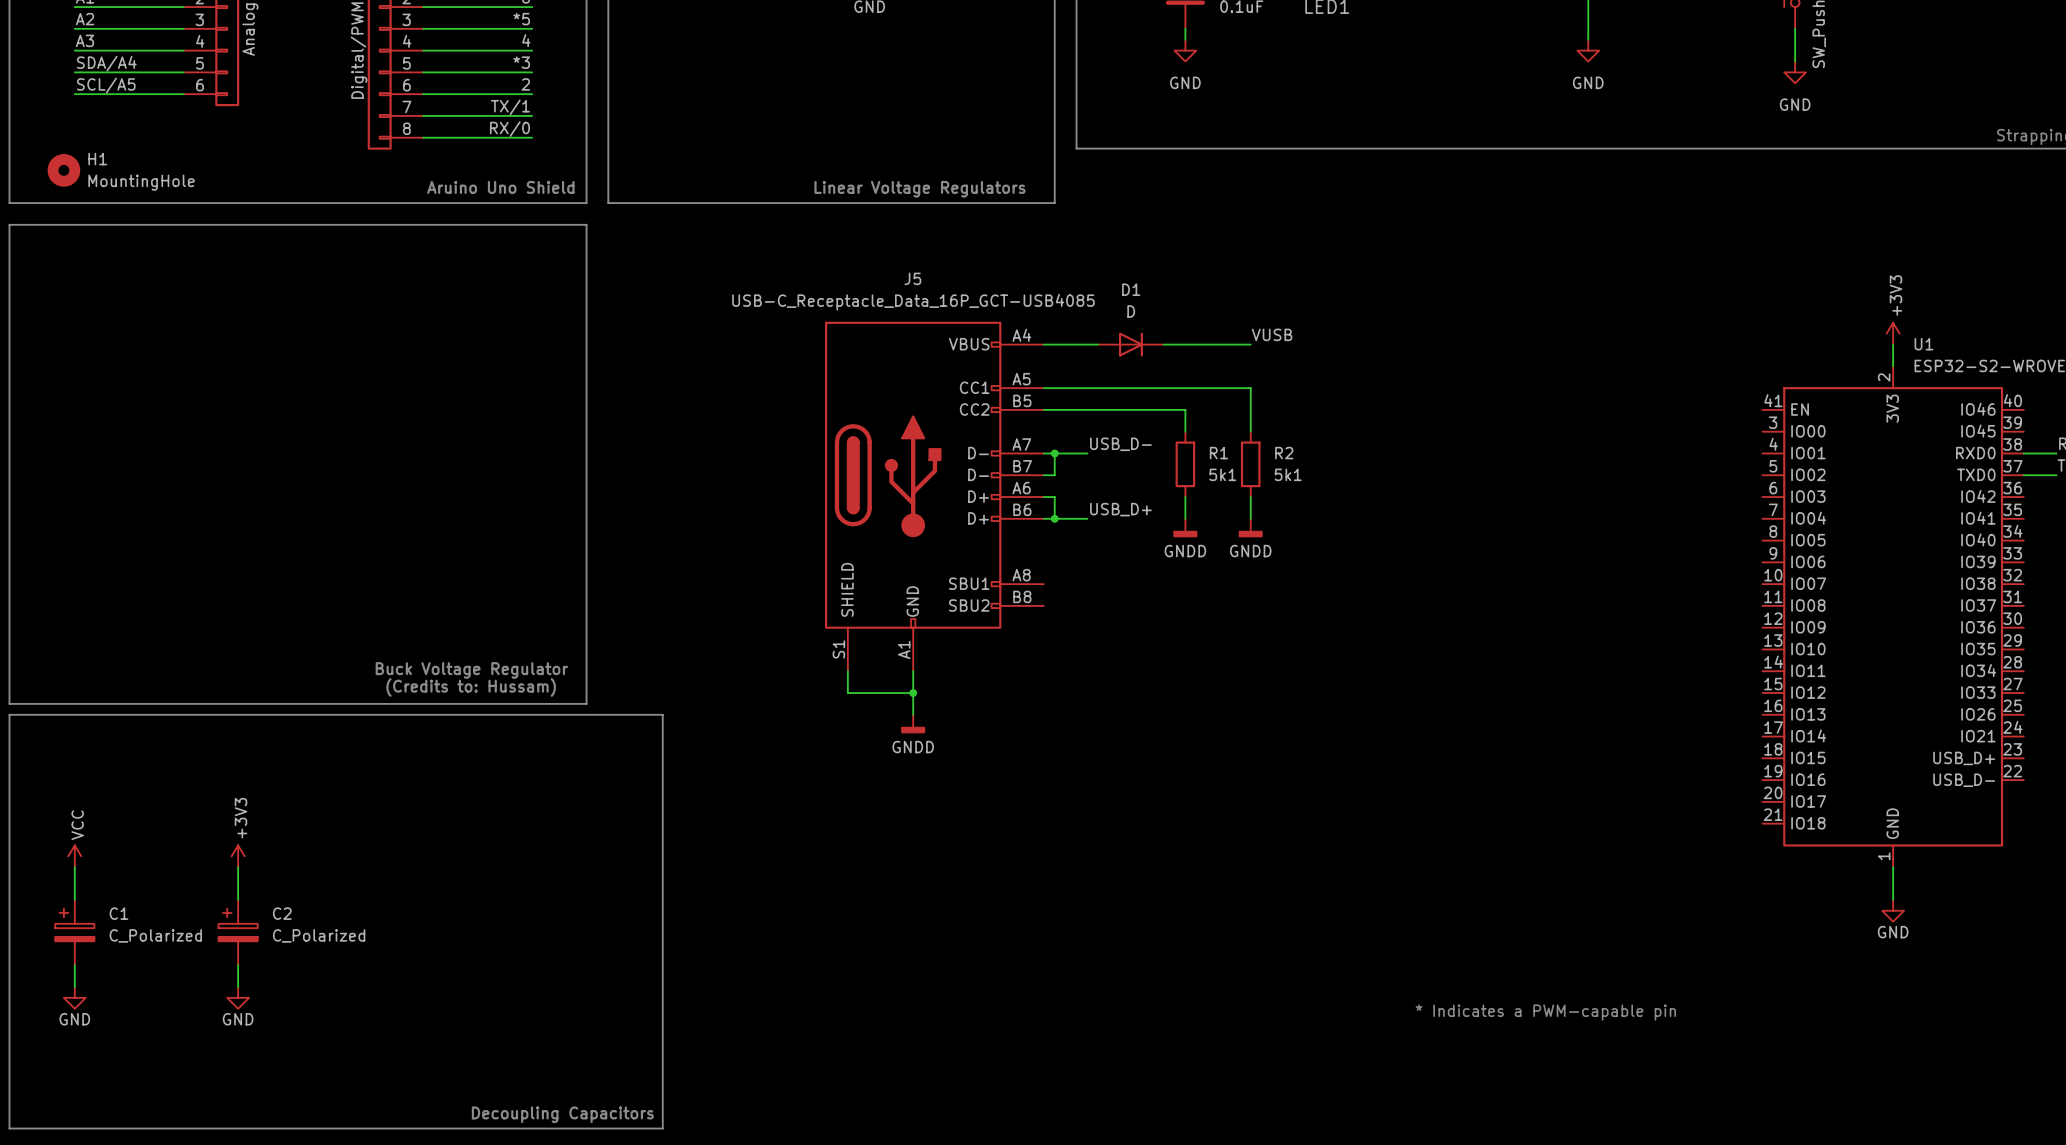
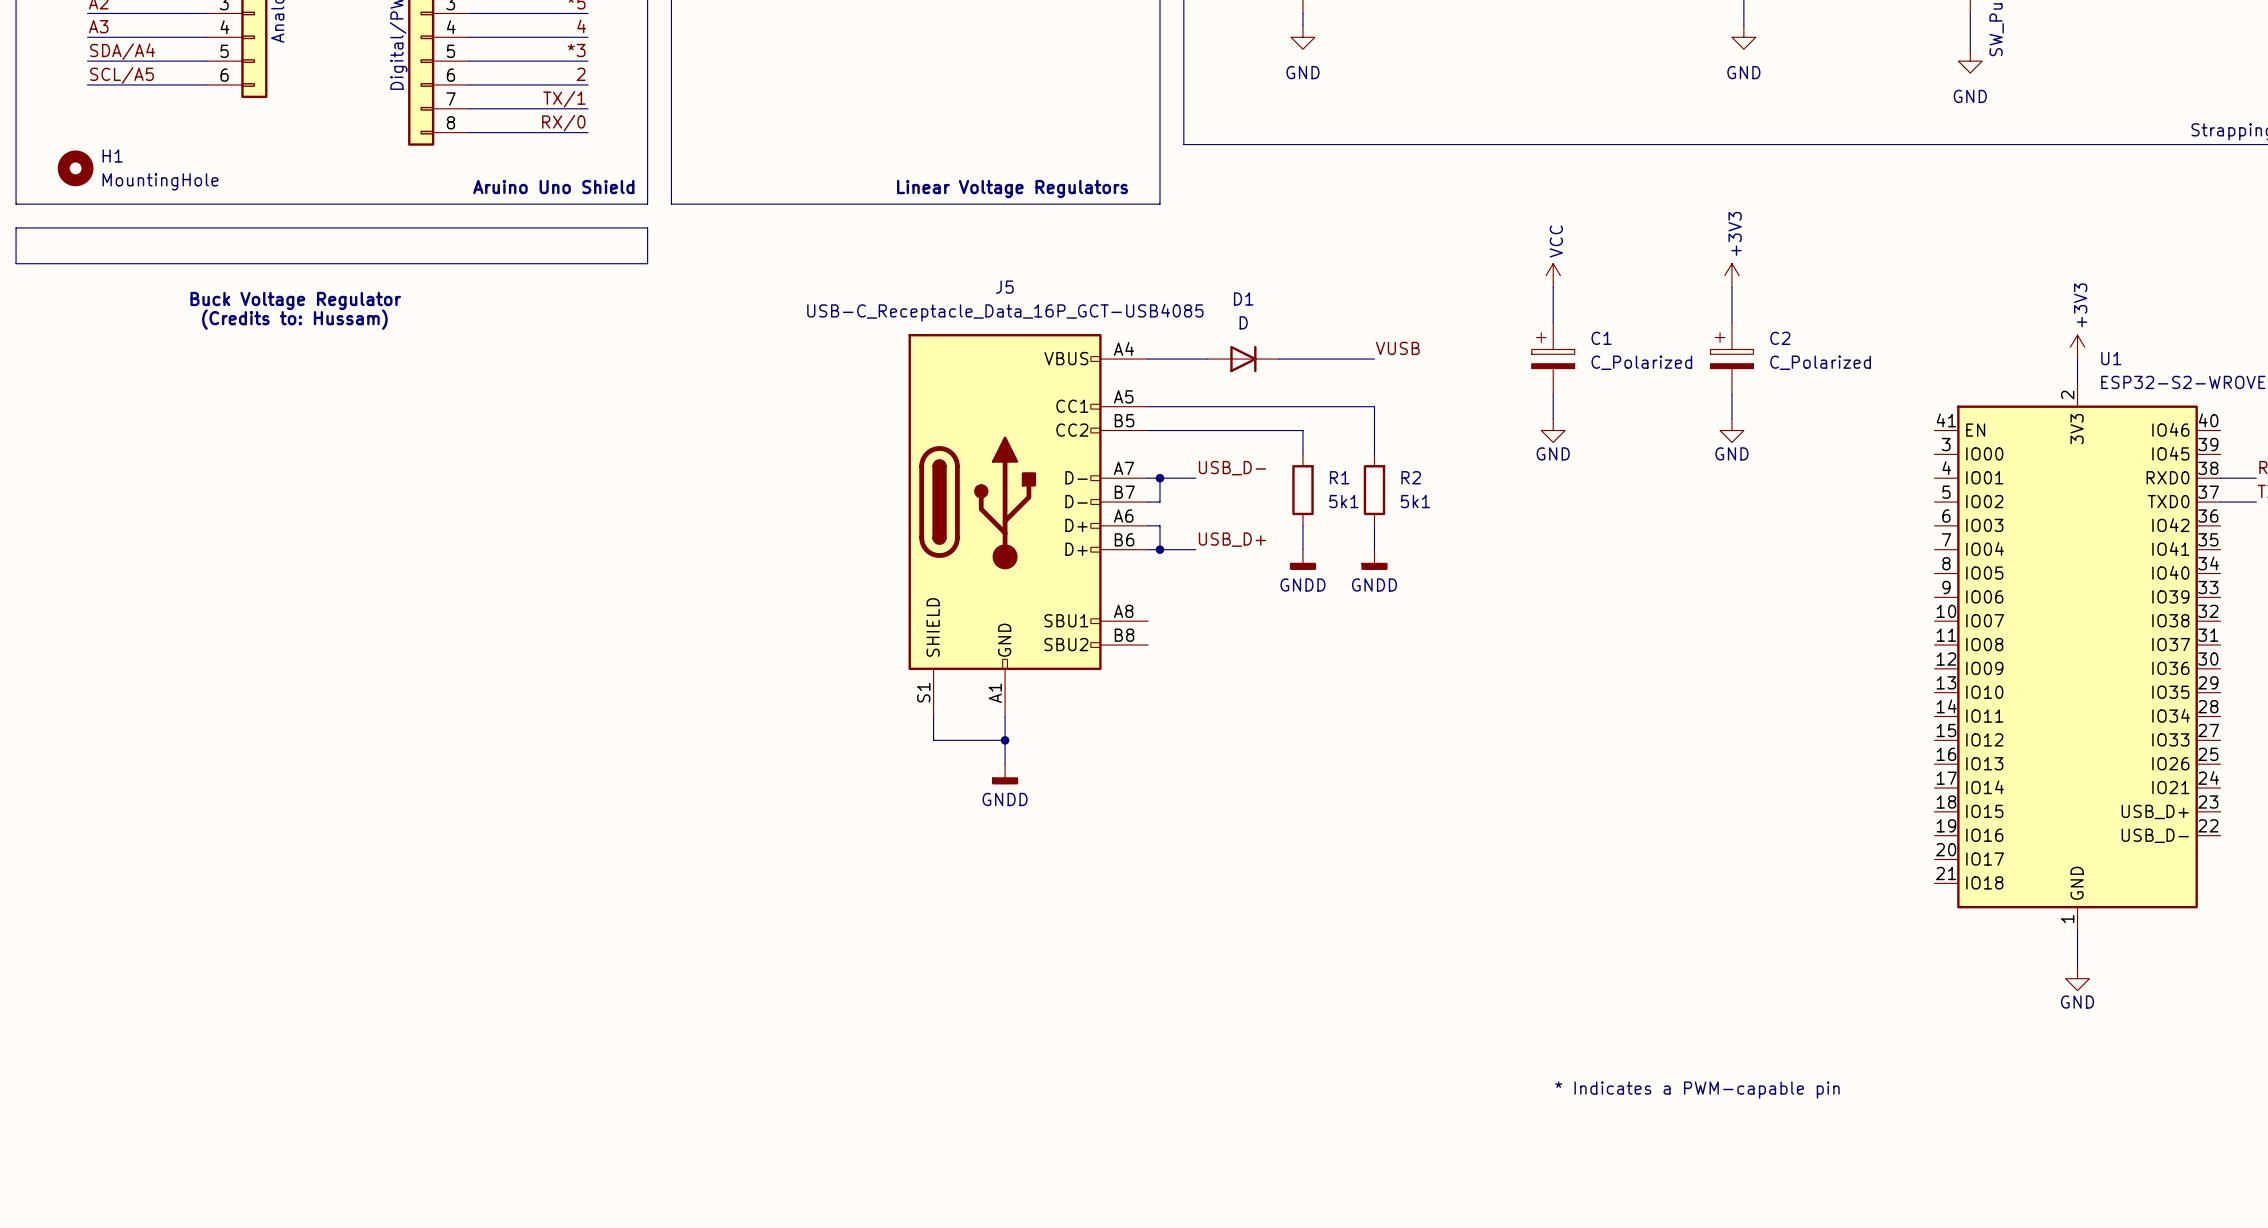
line: (9, 257) (9, 703) (586, 703) (586, 257) -> (16, 263) (647, 263)
power symbol: none -> VCC (1553, 275)
power symbol: none -> +3V3 (1731, 275)
wire: none -> (1553, 287) (1553, 323)
wire: none -> (1731, 287) (1731, 323)
text: none -> Buck Voltage Regulator (295, 300)
text: none -> (Credits to: Hussam) (294, 319)
wire: none -> (1553, 394) (1553, 418)
wire: none -> (1731, 394) (1731, 418)
power symbol: none -> GND (1553, 430)
power symbol: none -> GND (1731, 430)
text: Buck Voltage Regulator (471, 670) -> none
text: (Credits to: Hussam) (471, 687) -> none
line: (9, 714) (9, 1128) (662, 1128) (662, 714) (9, 714) -> none
power symbol: VCC (74, 856) -> none
power symbol: +3V3 (238, 856) -> none
wire: (74, 867) (74, 899) -> none
wire: (238, 867) (238, 899) -> none
C1 position: (74, 932) -> (1553, 359)
C2 position: (238, 932) -> (1731, 359)
wire: (74, 965) (74, 986) -> none
wire: (238, 965) (238, 986) -> none
power symbol: GND (74, 997) -> none
power symbol: GND (238, 997) -> none
text: Decoupling Capacitors (562, 1114) -> none

